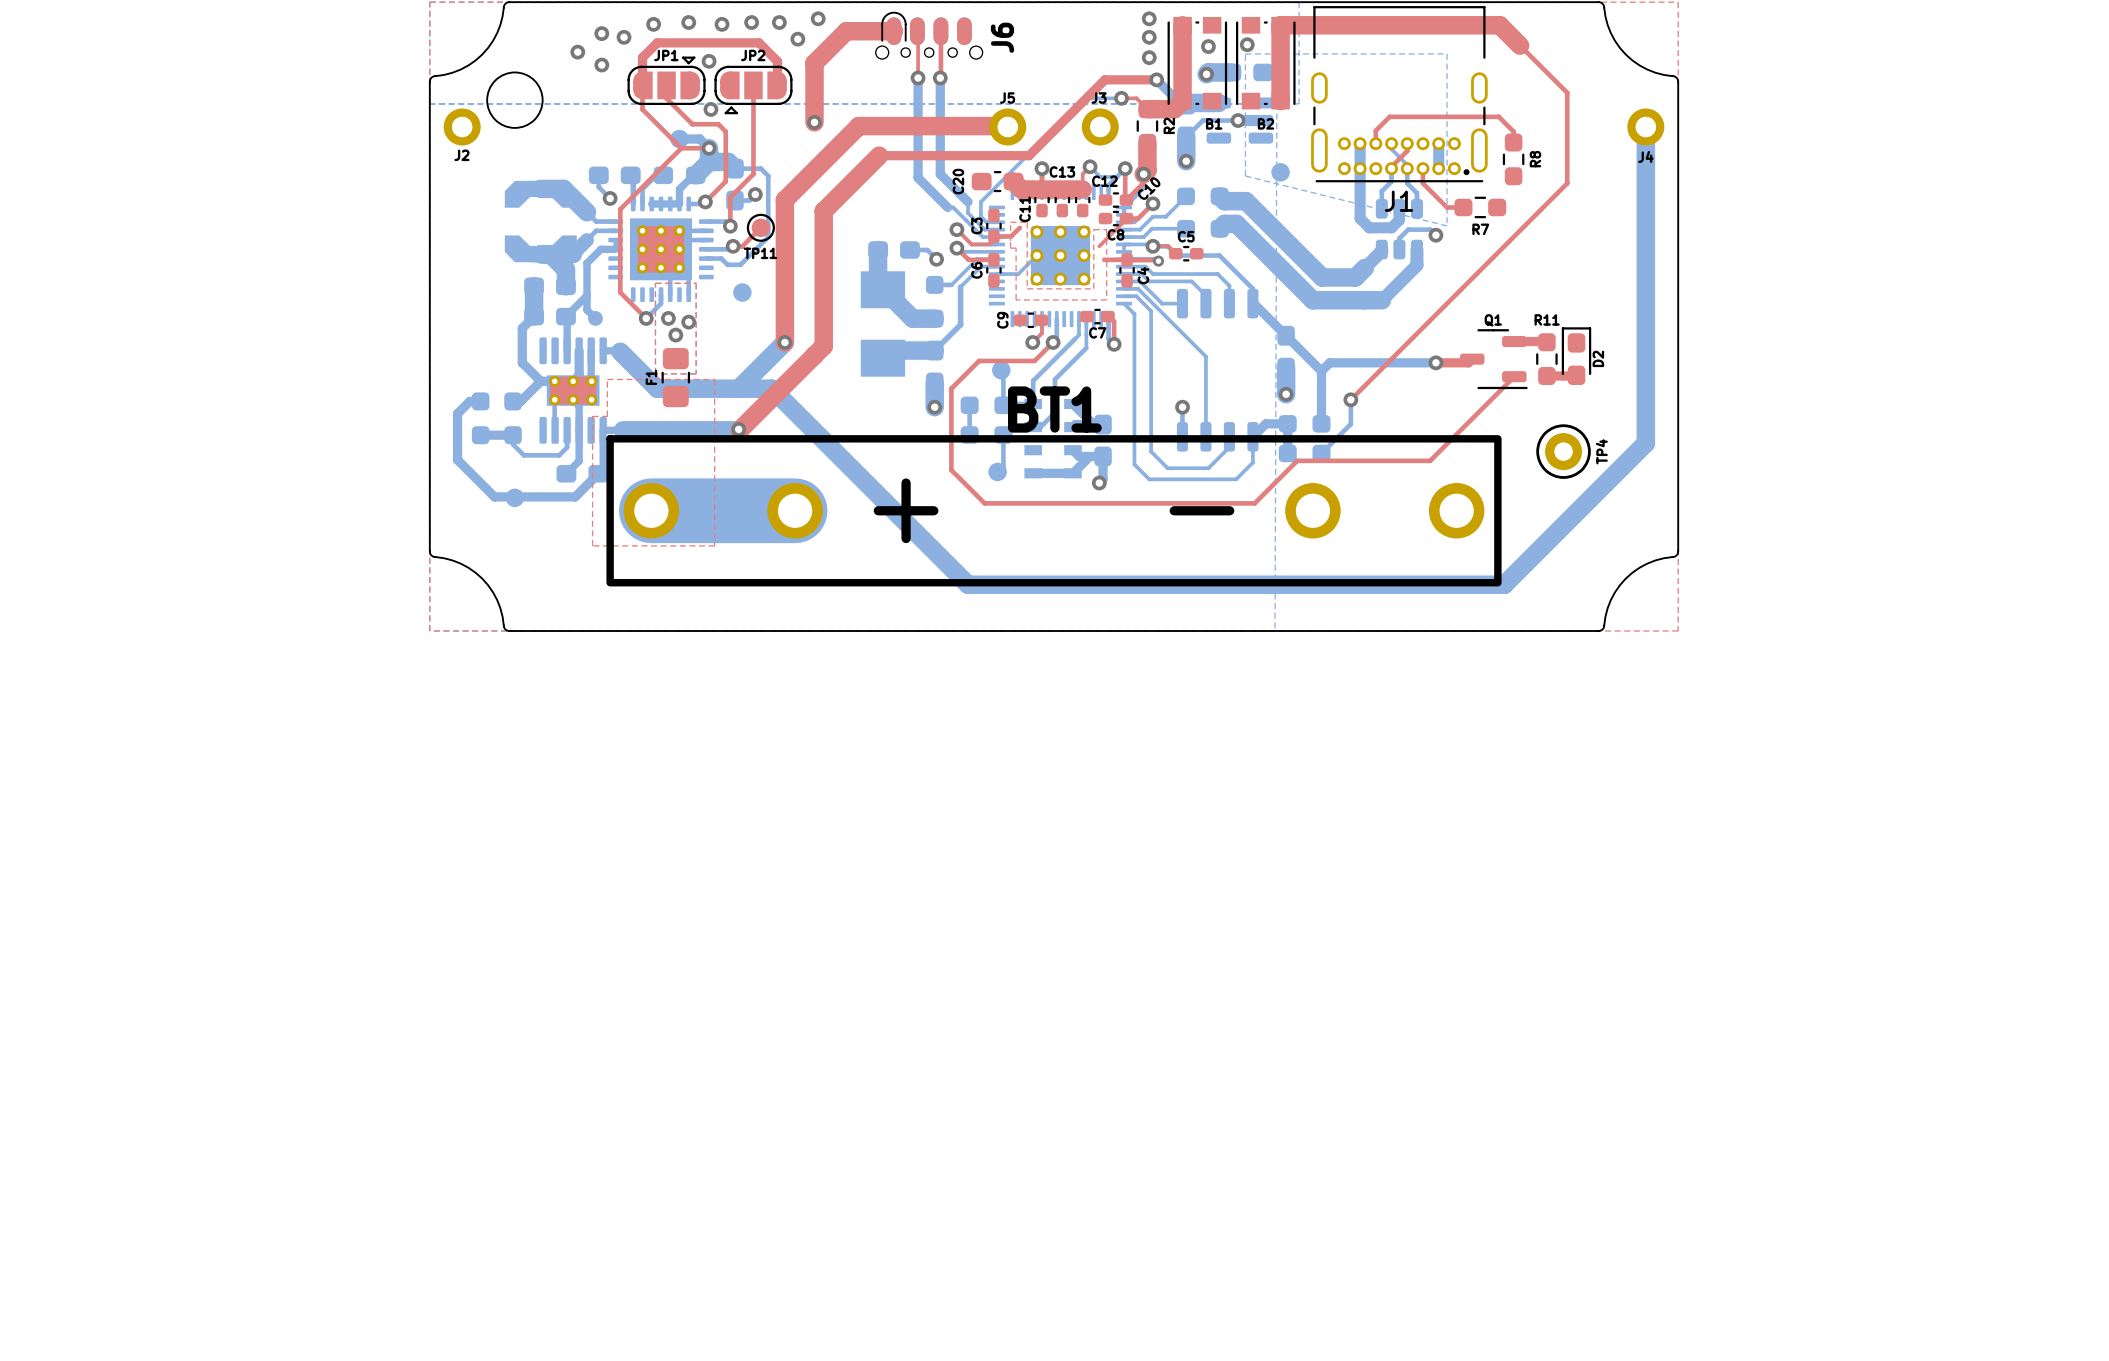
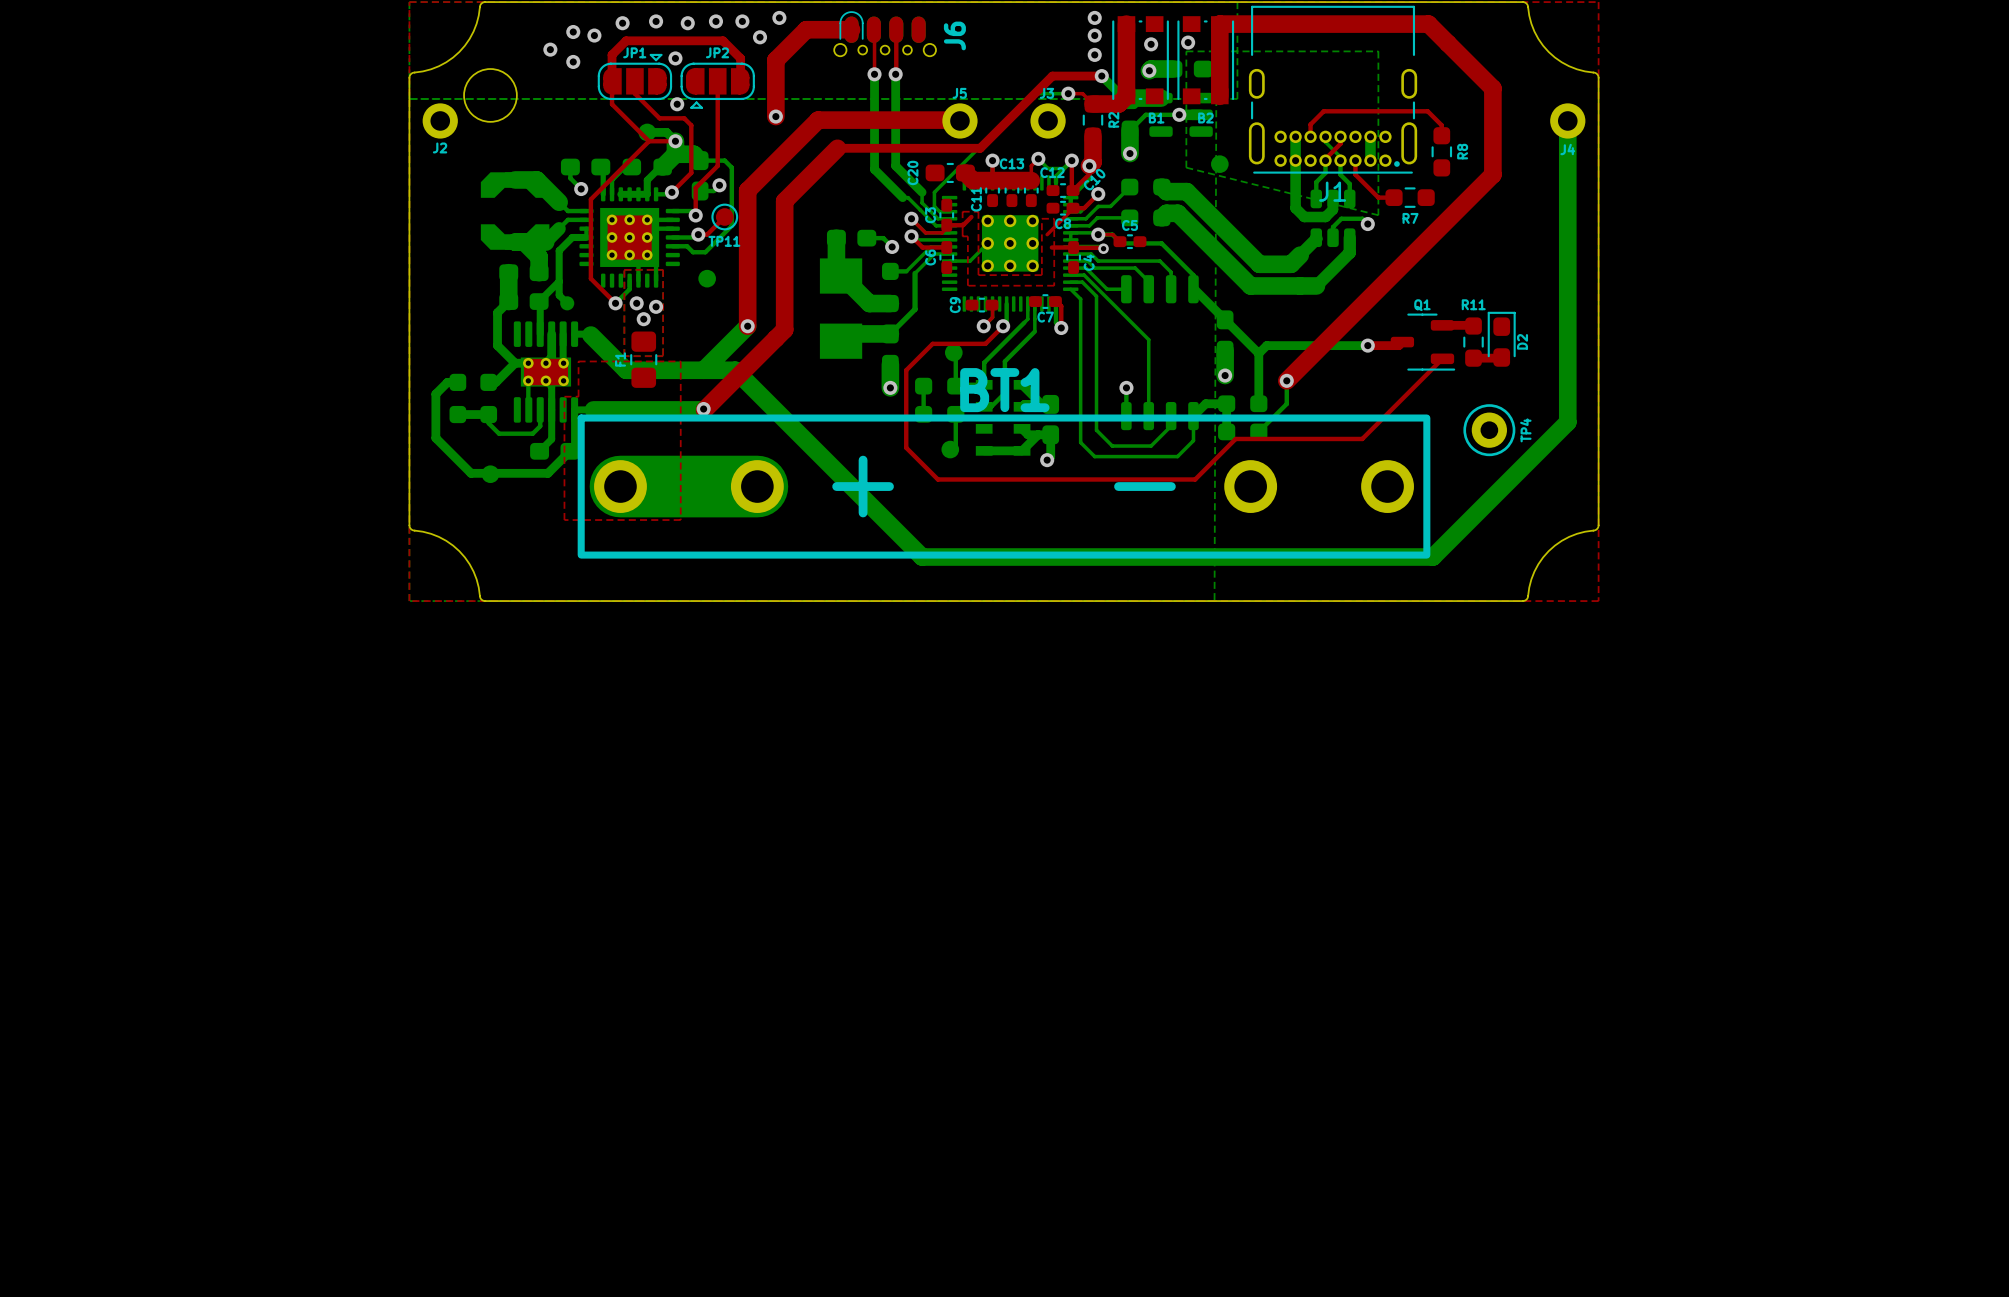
top track width: thin (1520, 45) (1567, 92) (1567, 183) (1350, 399) -> thick (1447, 43) (1492, 88) (1492, 174) (1286, 380)

